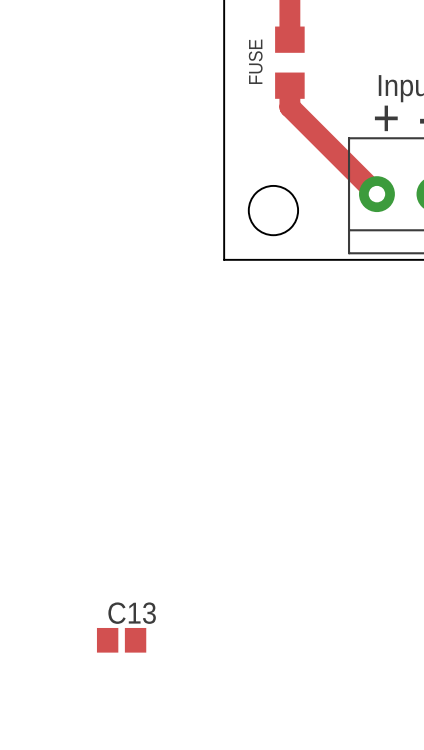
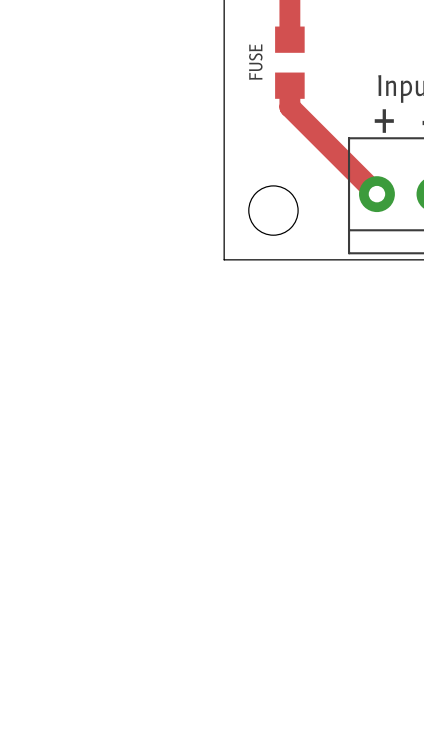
C13: (121, 640) -> none

